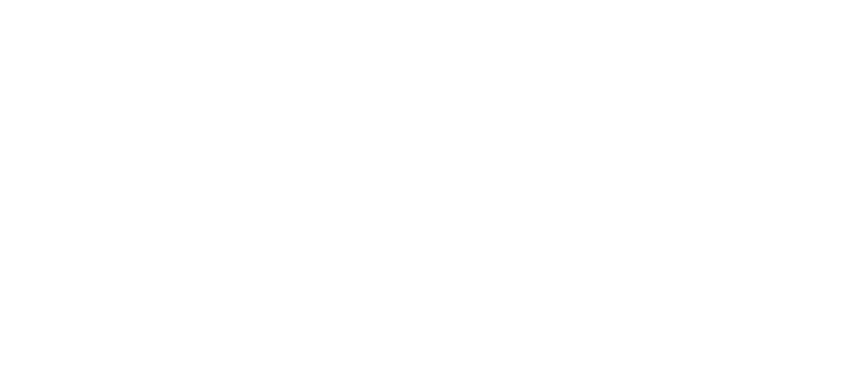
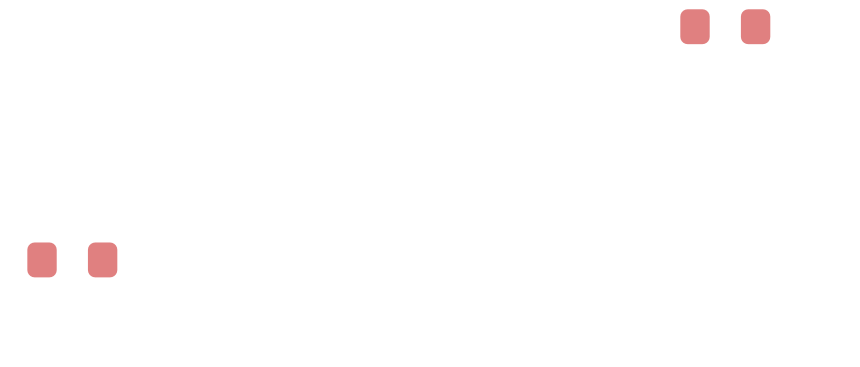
part: none -> (725, 26)
part: none -> (72, 259)

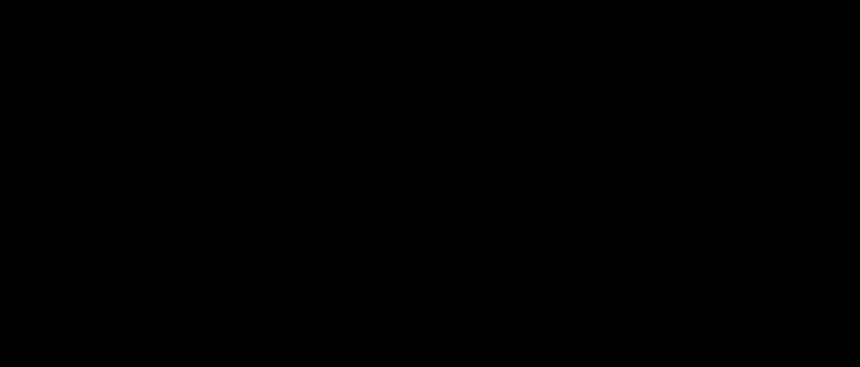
part: (725, 26) -> none
part: (72, 259) -> none

